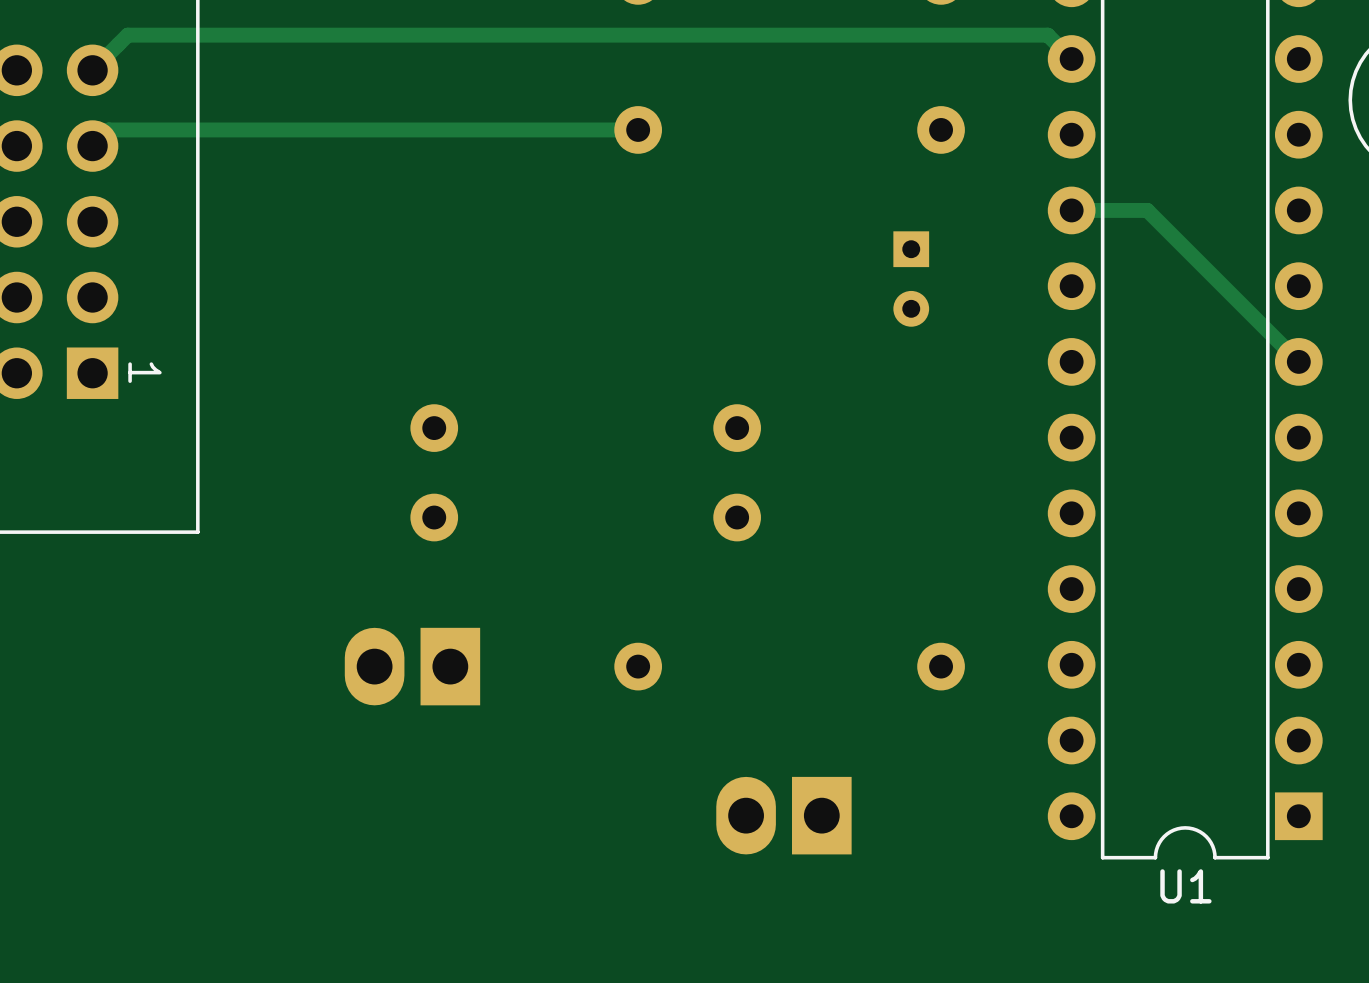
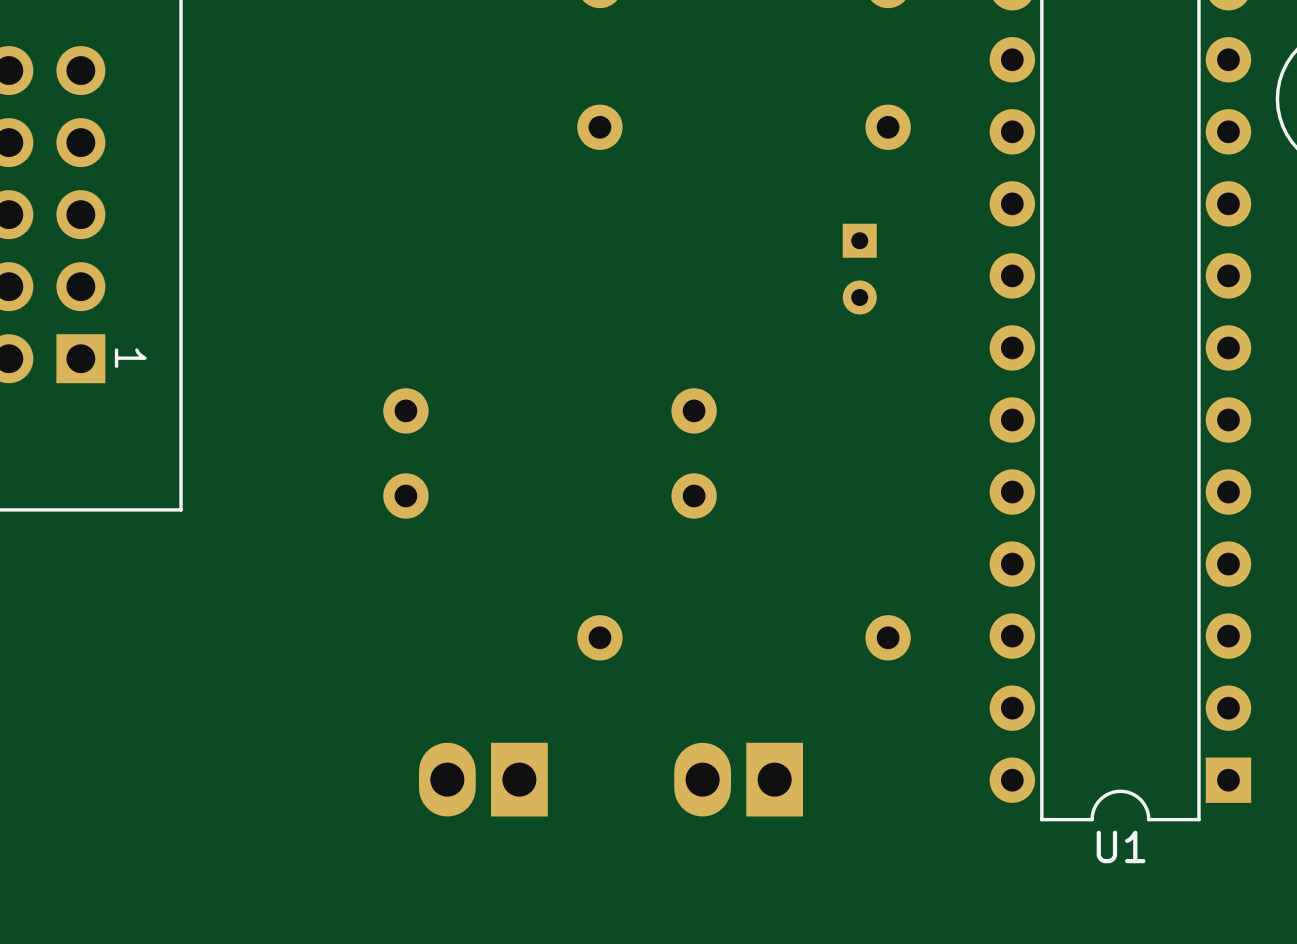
track: (1071, 59) (1047, 35) (127, 35) (92, 70) -> none
track: (638, 129) (108, 129) (92, 146) -> none
track: (1071, 210) (1147, 210) (1298, 361) -> none
part position: (412, 666) -> (483, 779)

